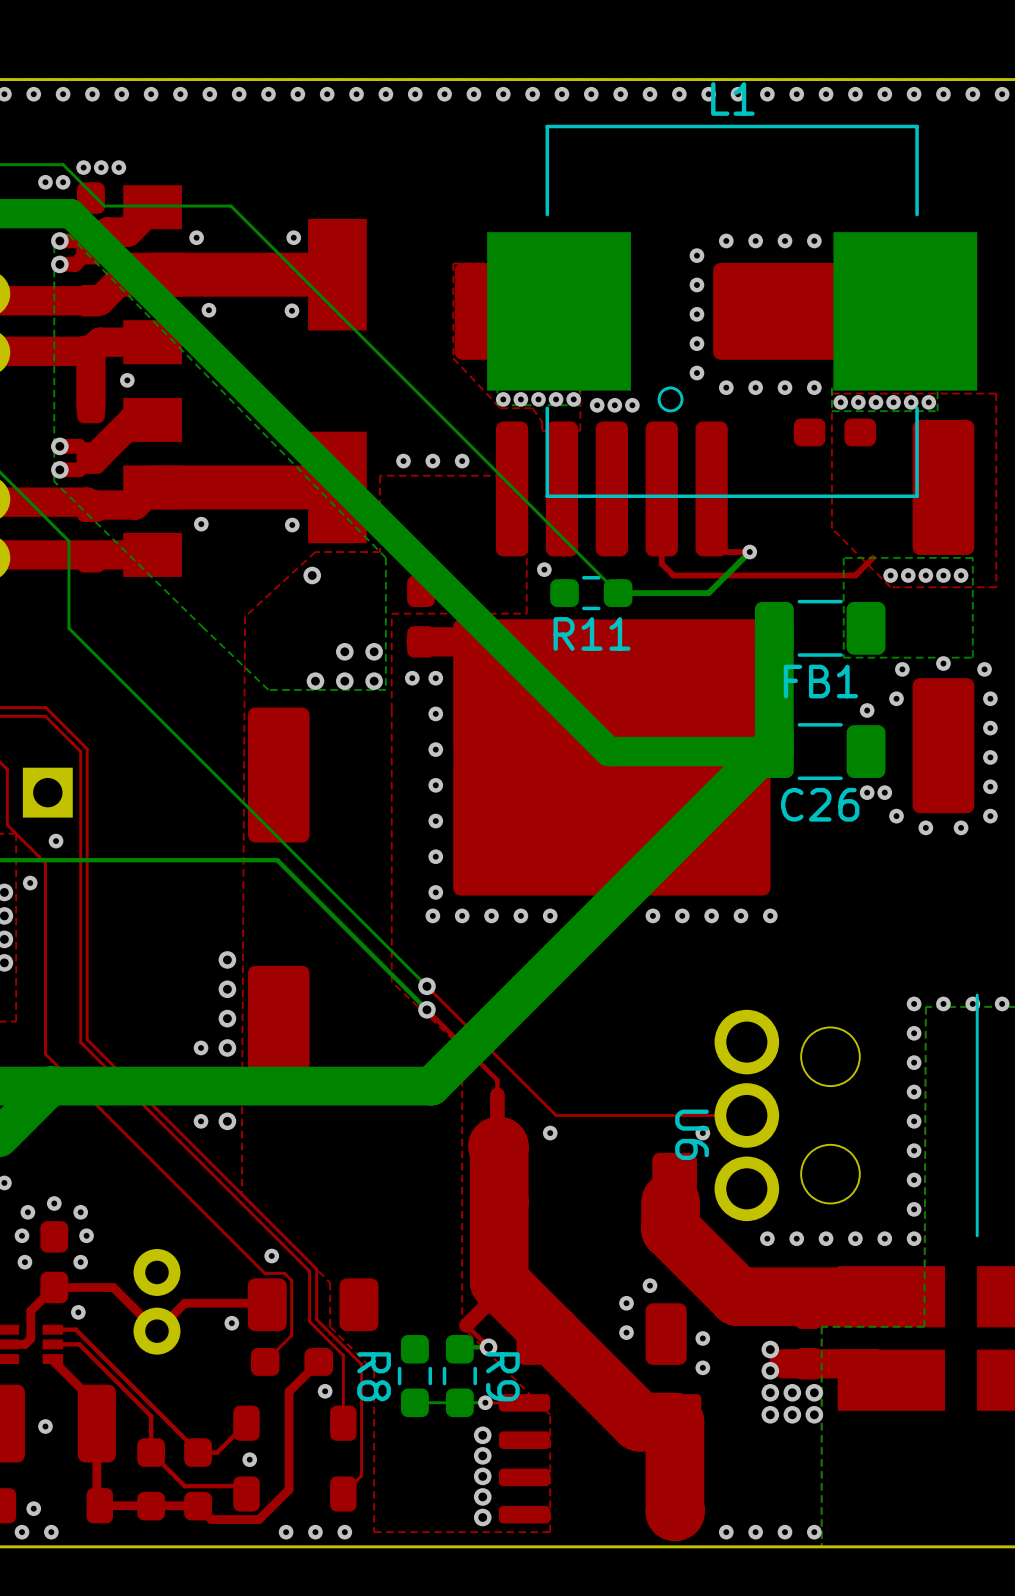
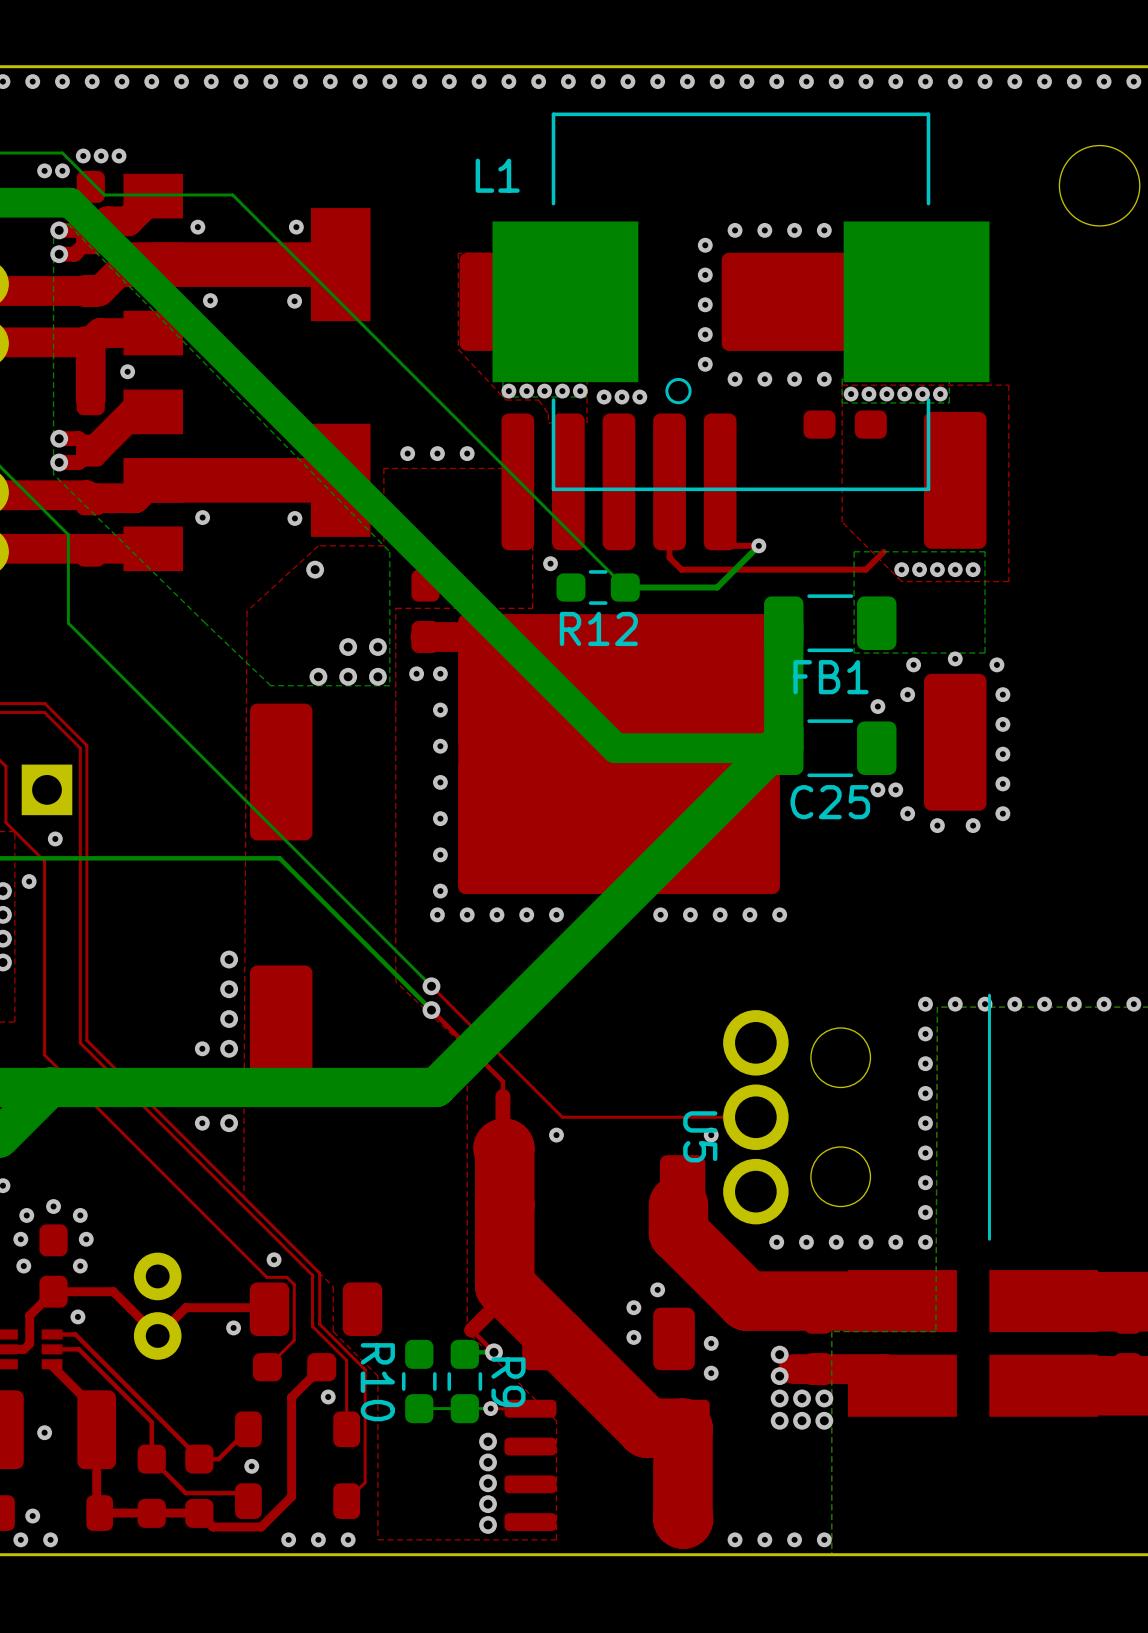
L1 name position: L1 (732, 99) -> L1 (497, 175)
R11 name: R11 (592, 633) -> R12 (598, 628)
C26 name: C26 (820, 804) -> C25 (830, 802)
U6 name: U6 (692, 1134) -> U5 (700, 1136)
R8 name: R8 (374, 1376) -> R10 (377, 1382)

